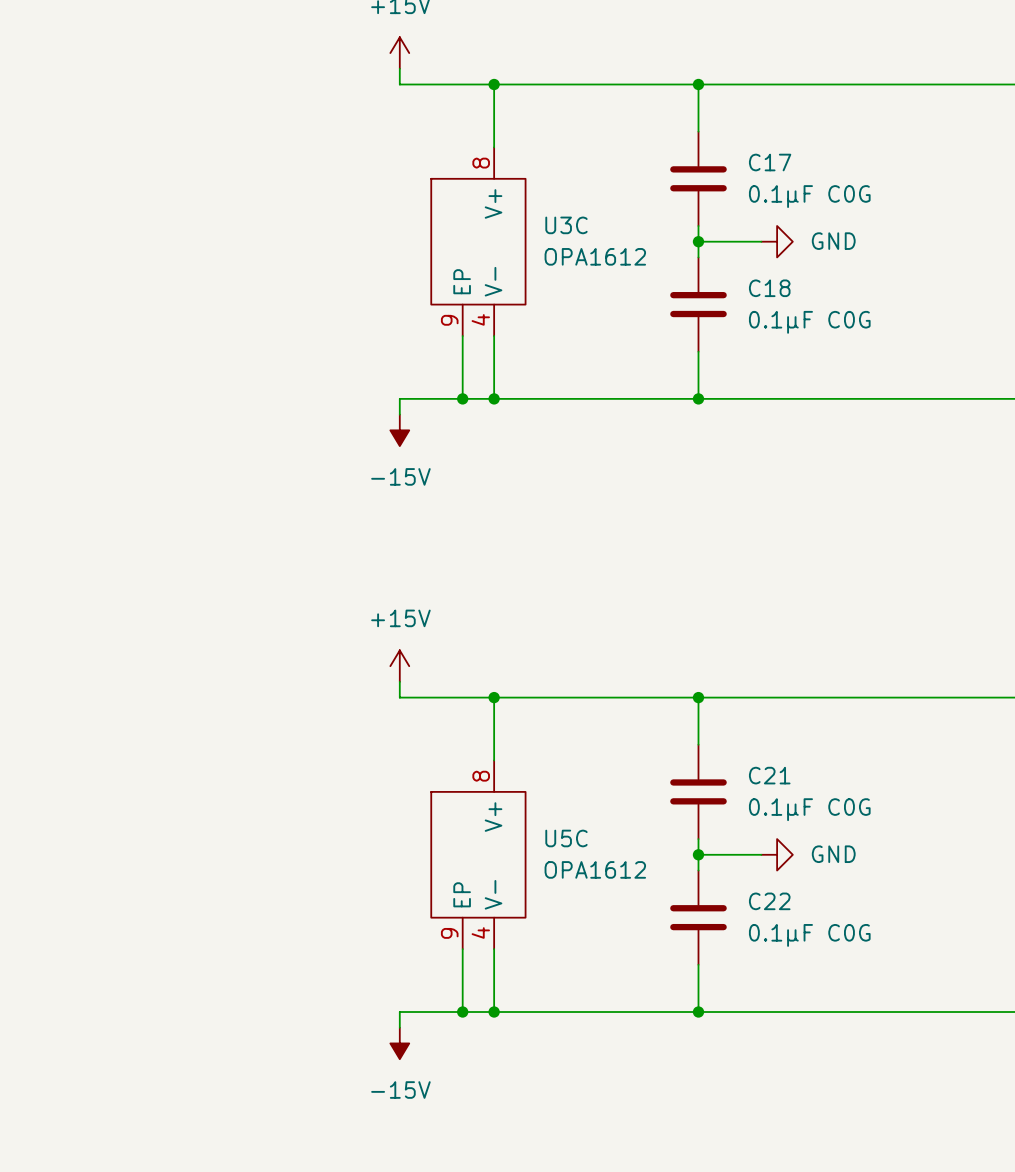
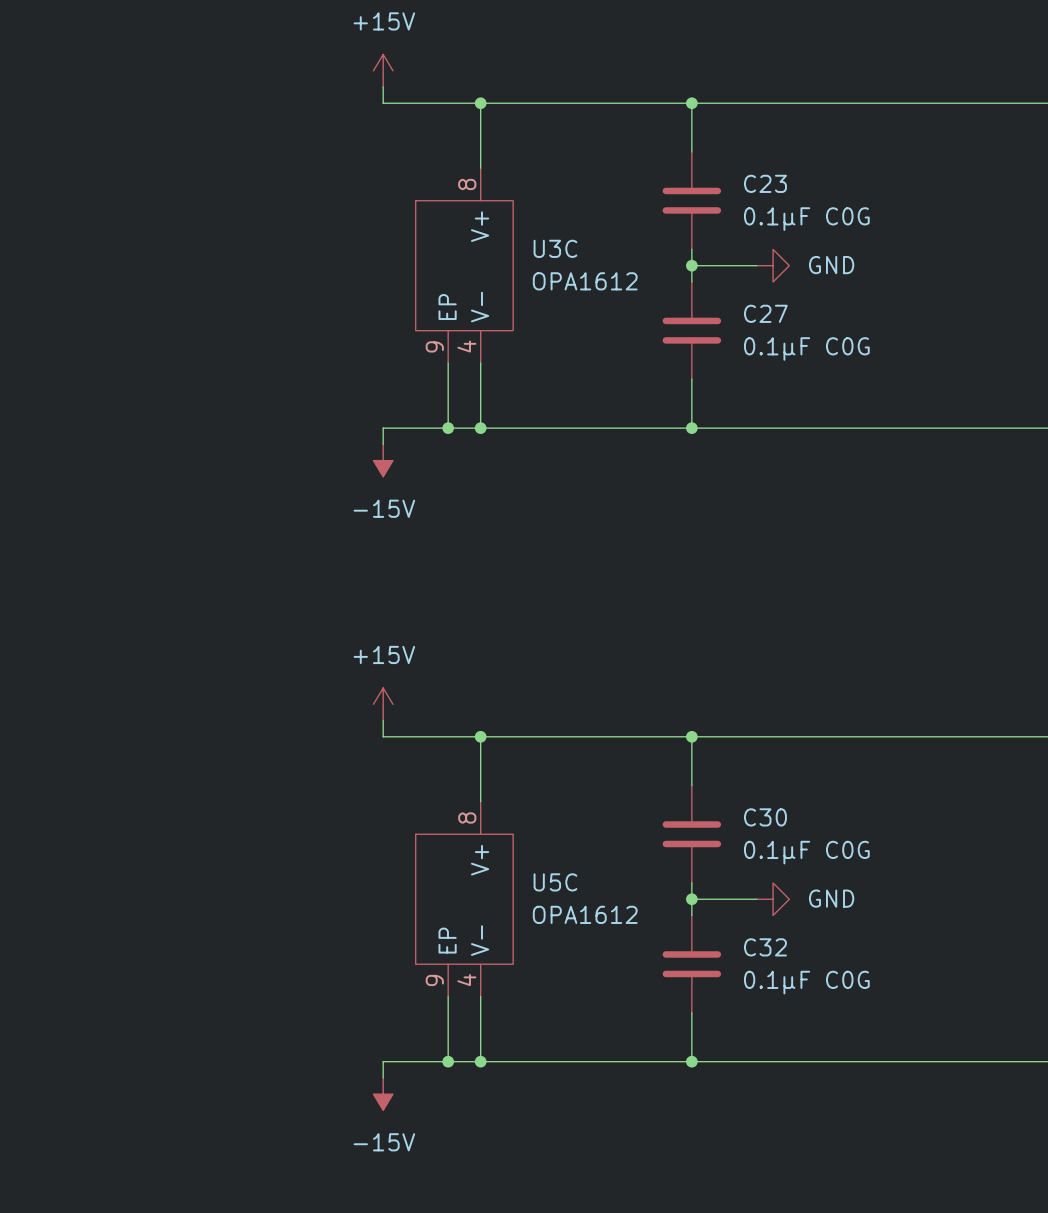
C17 name: C17 (770, 162) -> C23 (765, 183)
C18 name: C18 (769, 288) -> C27 (765, 313)
C21 name: C21 (769, 775) -> C30 (765, 817)
C22 name: C22 (769, 901) -> C32 (765, 947)

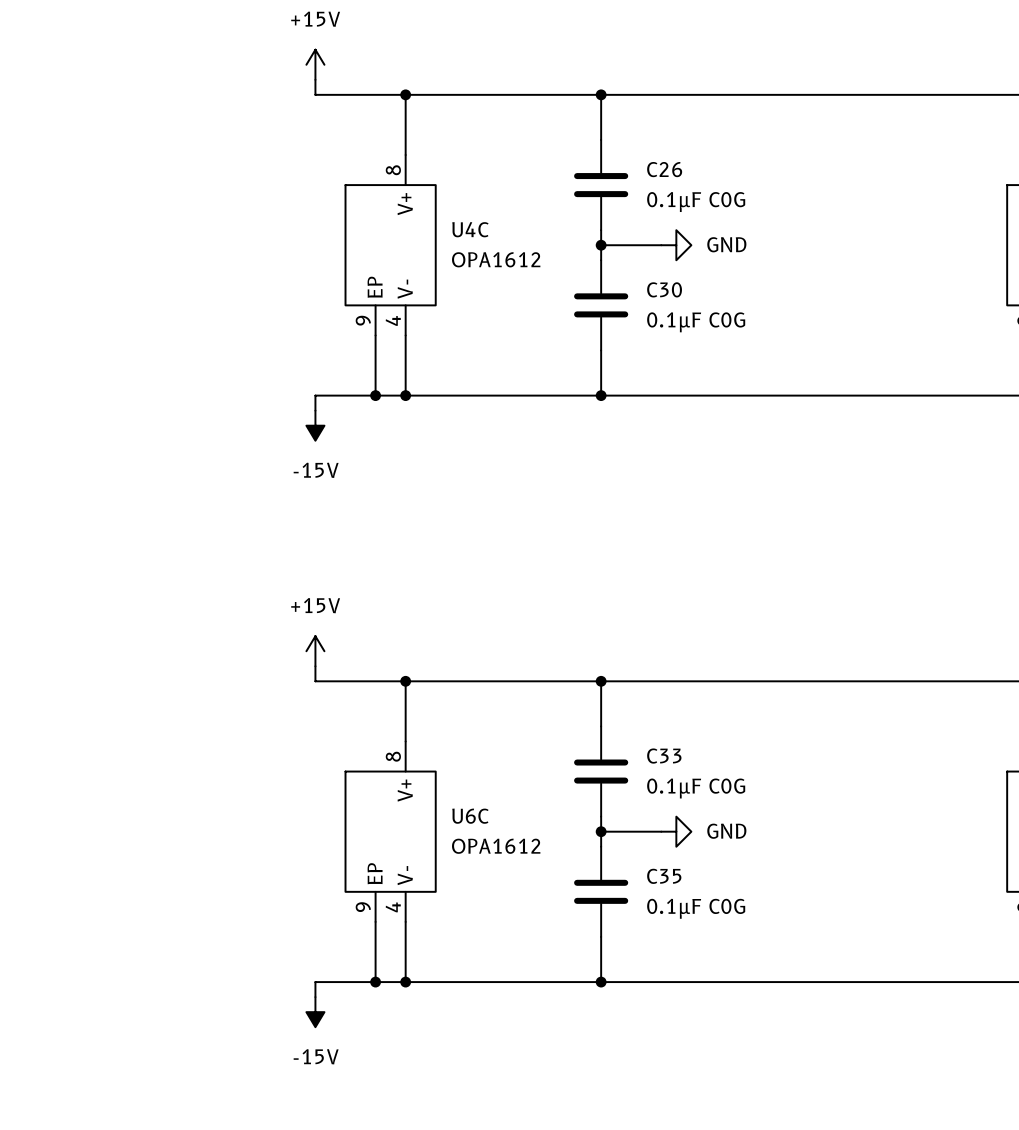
C23 name: C23 (765, 183) -> C26 (664, 169)
U3C name: U3C (555, 248) -> U4C (470, 229)
C27 name: C27 (765, 313) -> C30 (664, 289)
C30 name: C30 (765, 817) -> C33 (664, 756)
U5C name: U5C (555, 882) -> U6C (470, 816)
C32 name: C32 (765, 947) -> C35 (664, 876)

